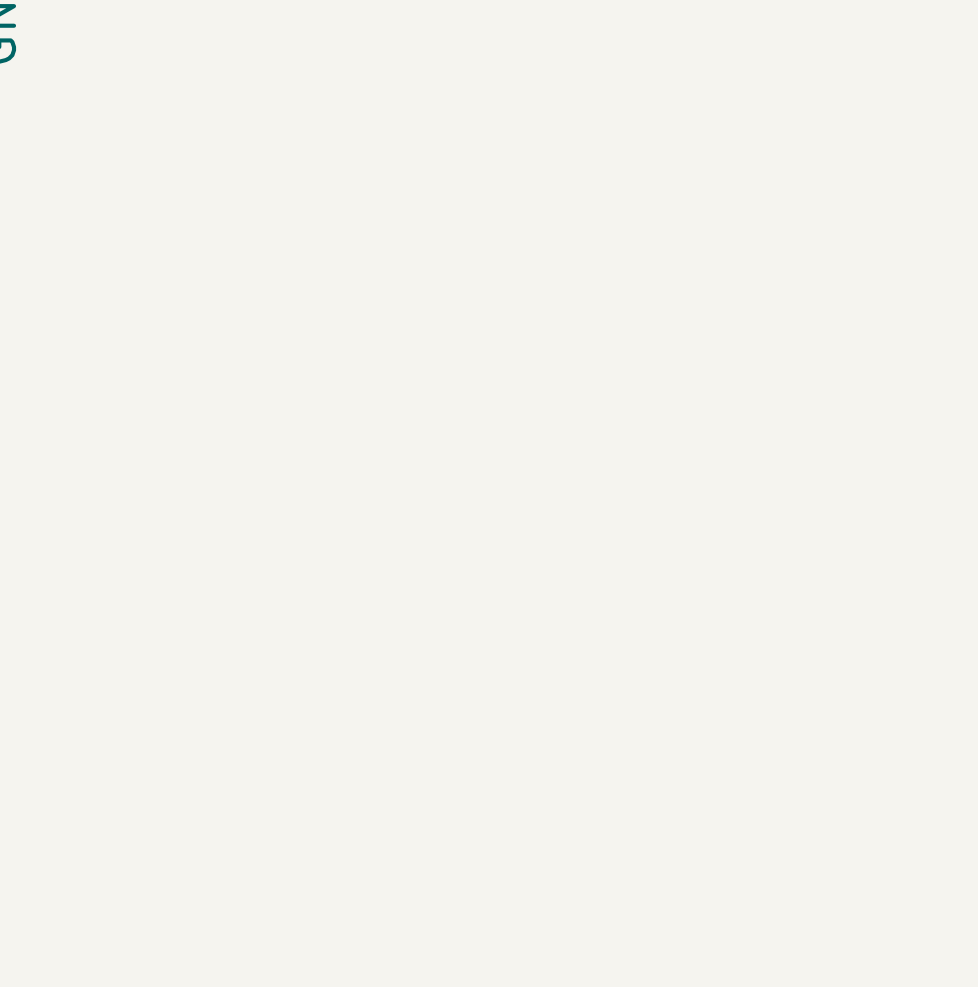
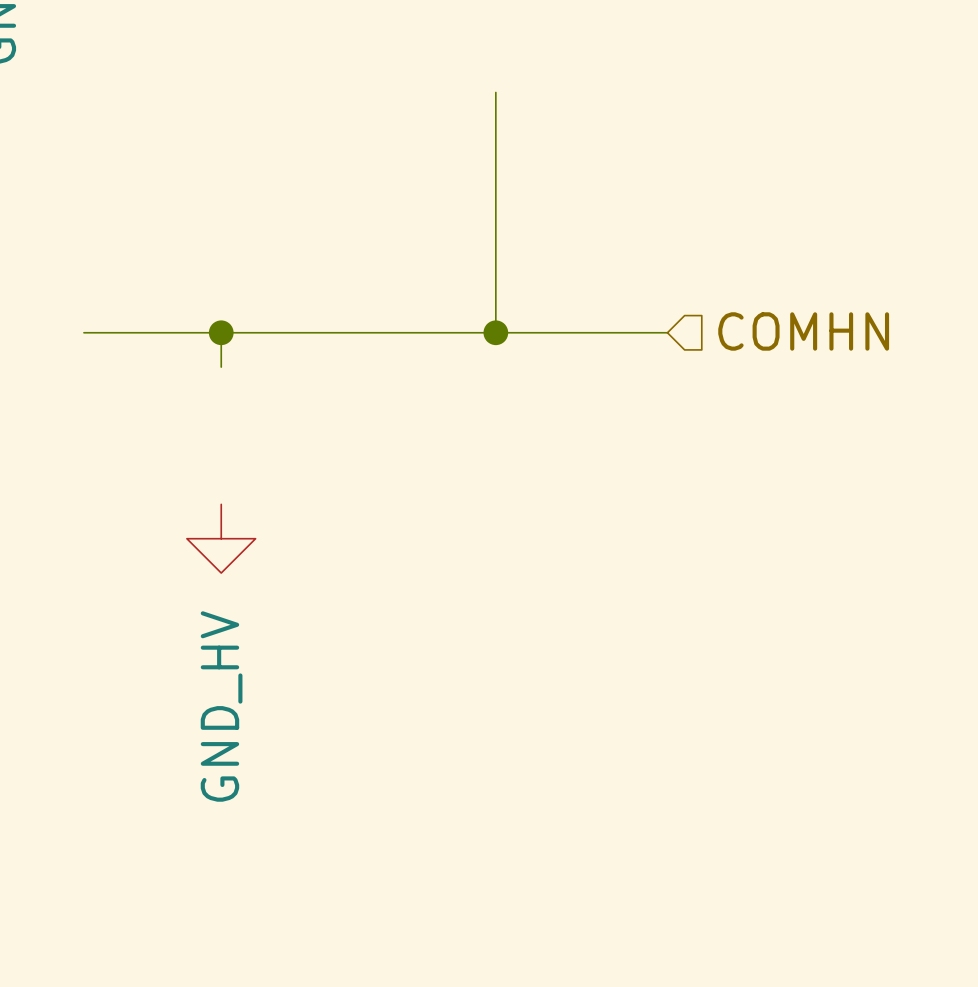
wire: none -> (495, 92) (495, 332)
hierarchical label: none -> COMHN (803, 331)
wire: none -> (83, 332) (667, 332)
wire: none -> (221, 332) (221, 367)
junction: none -> (221, 332)
junction: none -> (495, 332)
power symbol: none -> GND_HV (221, 538)

